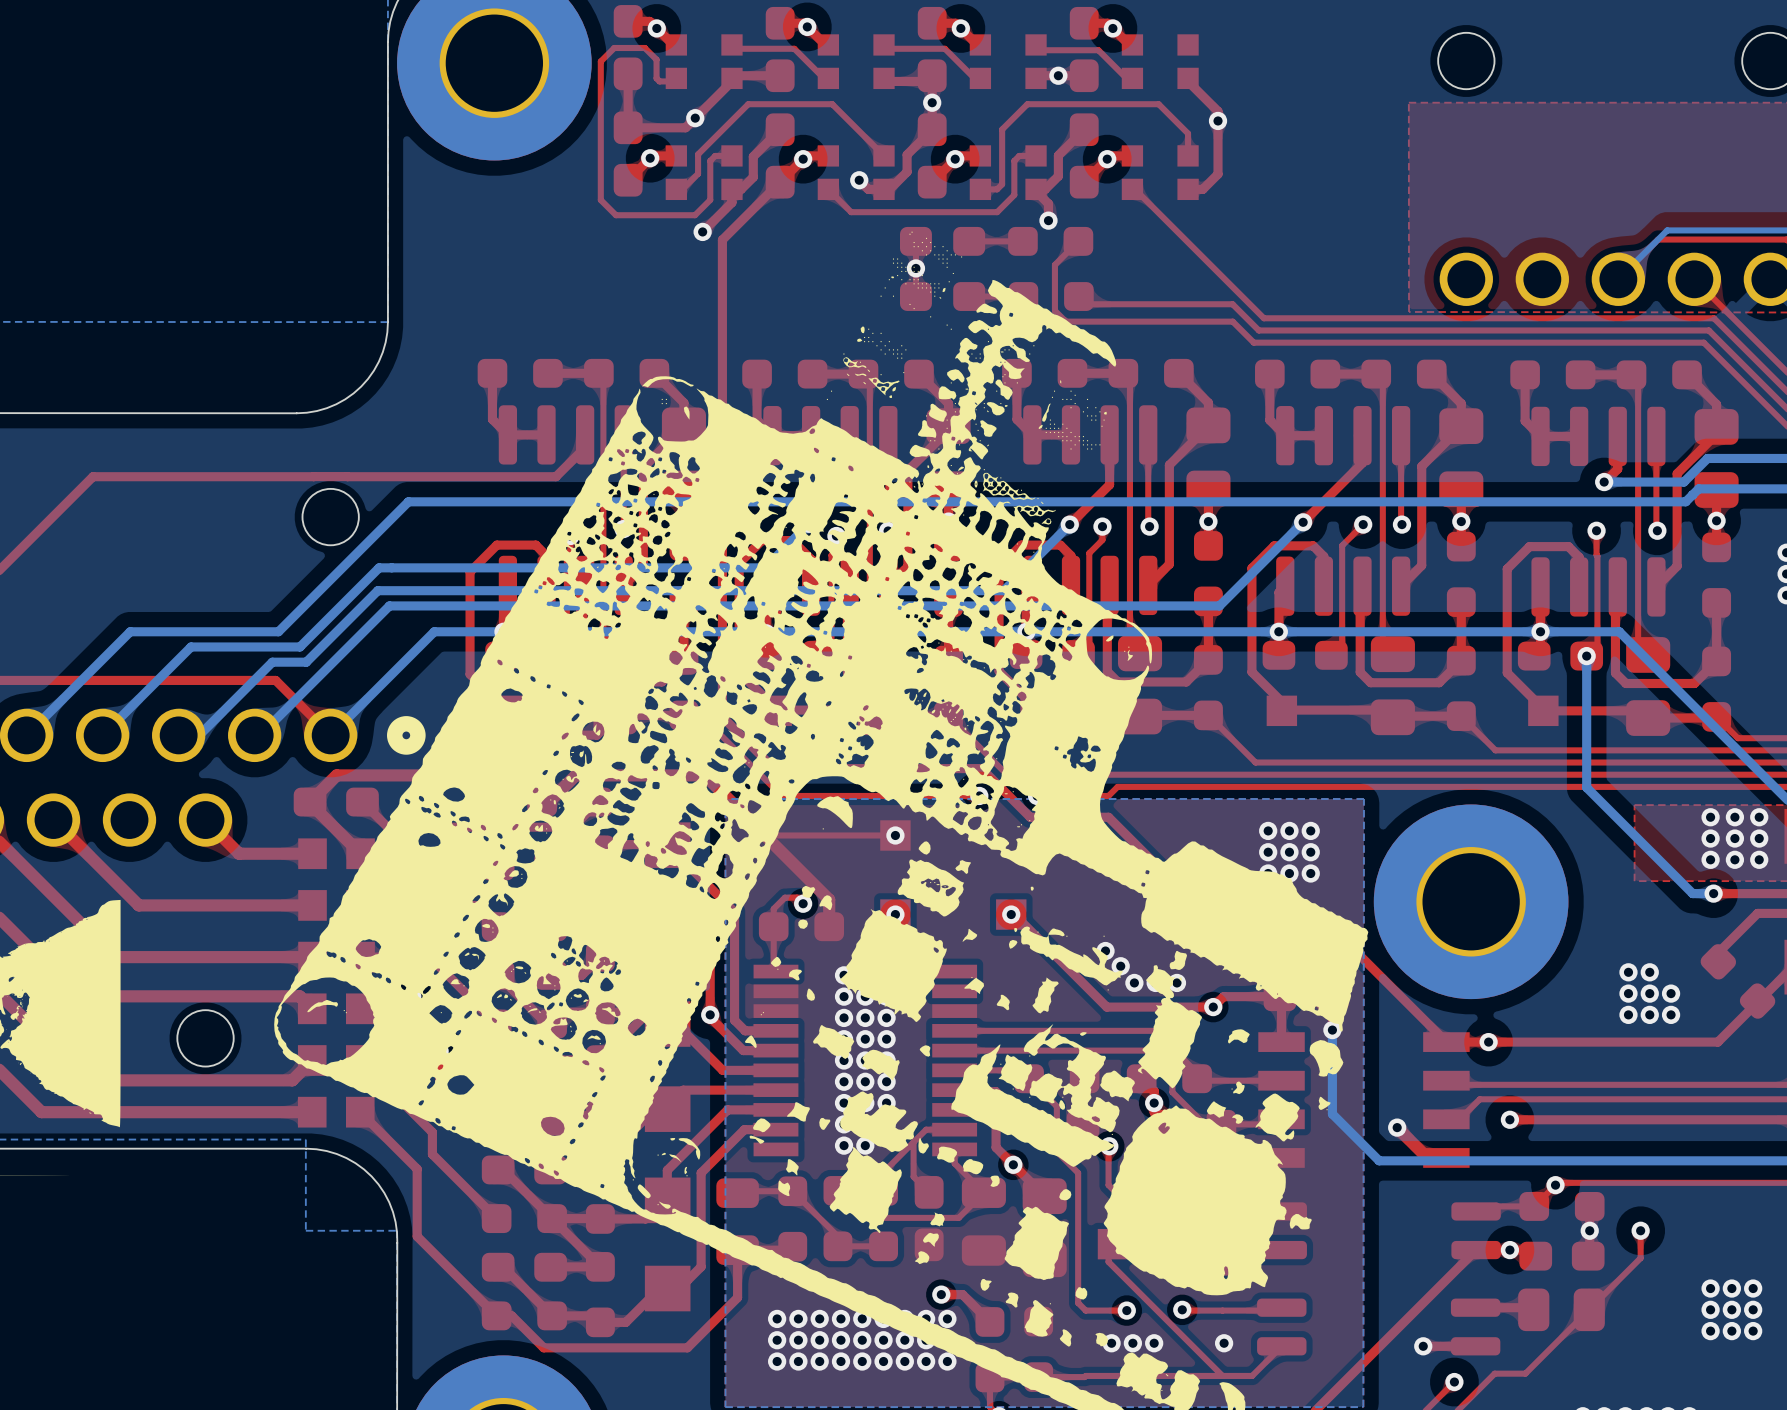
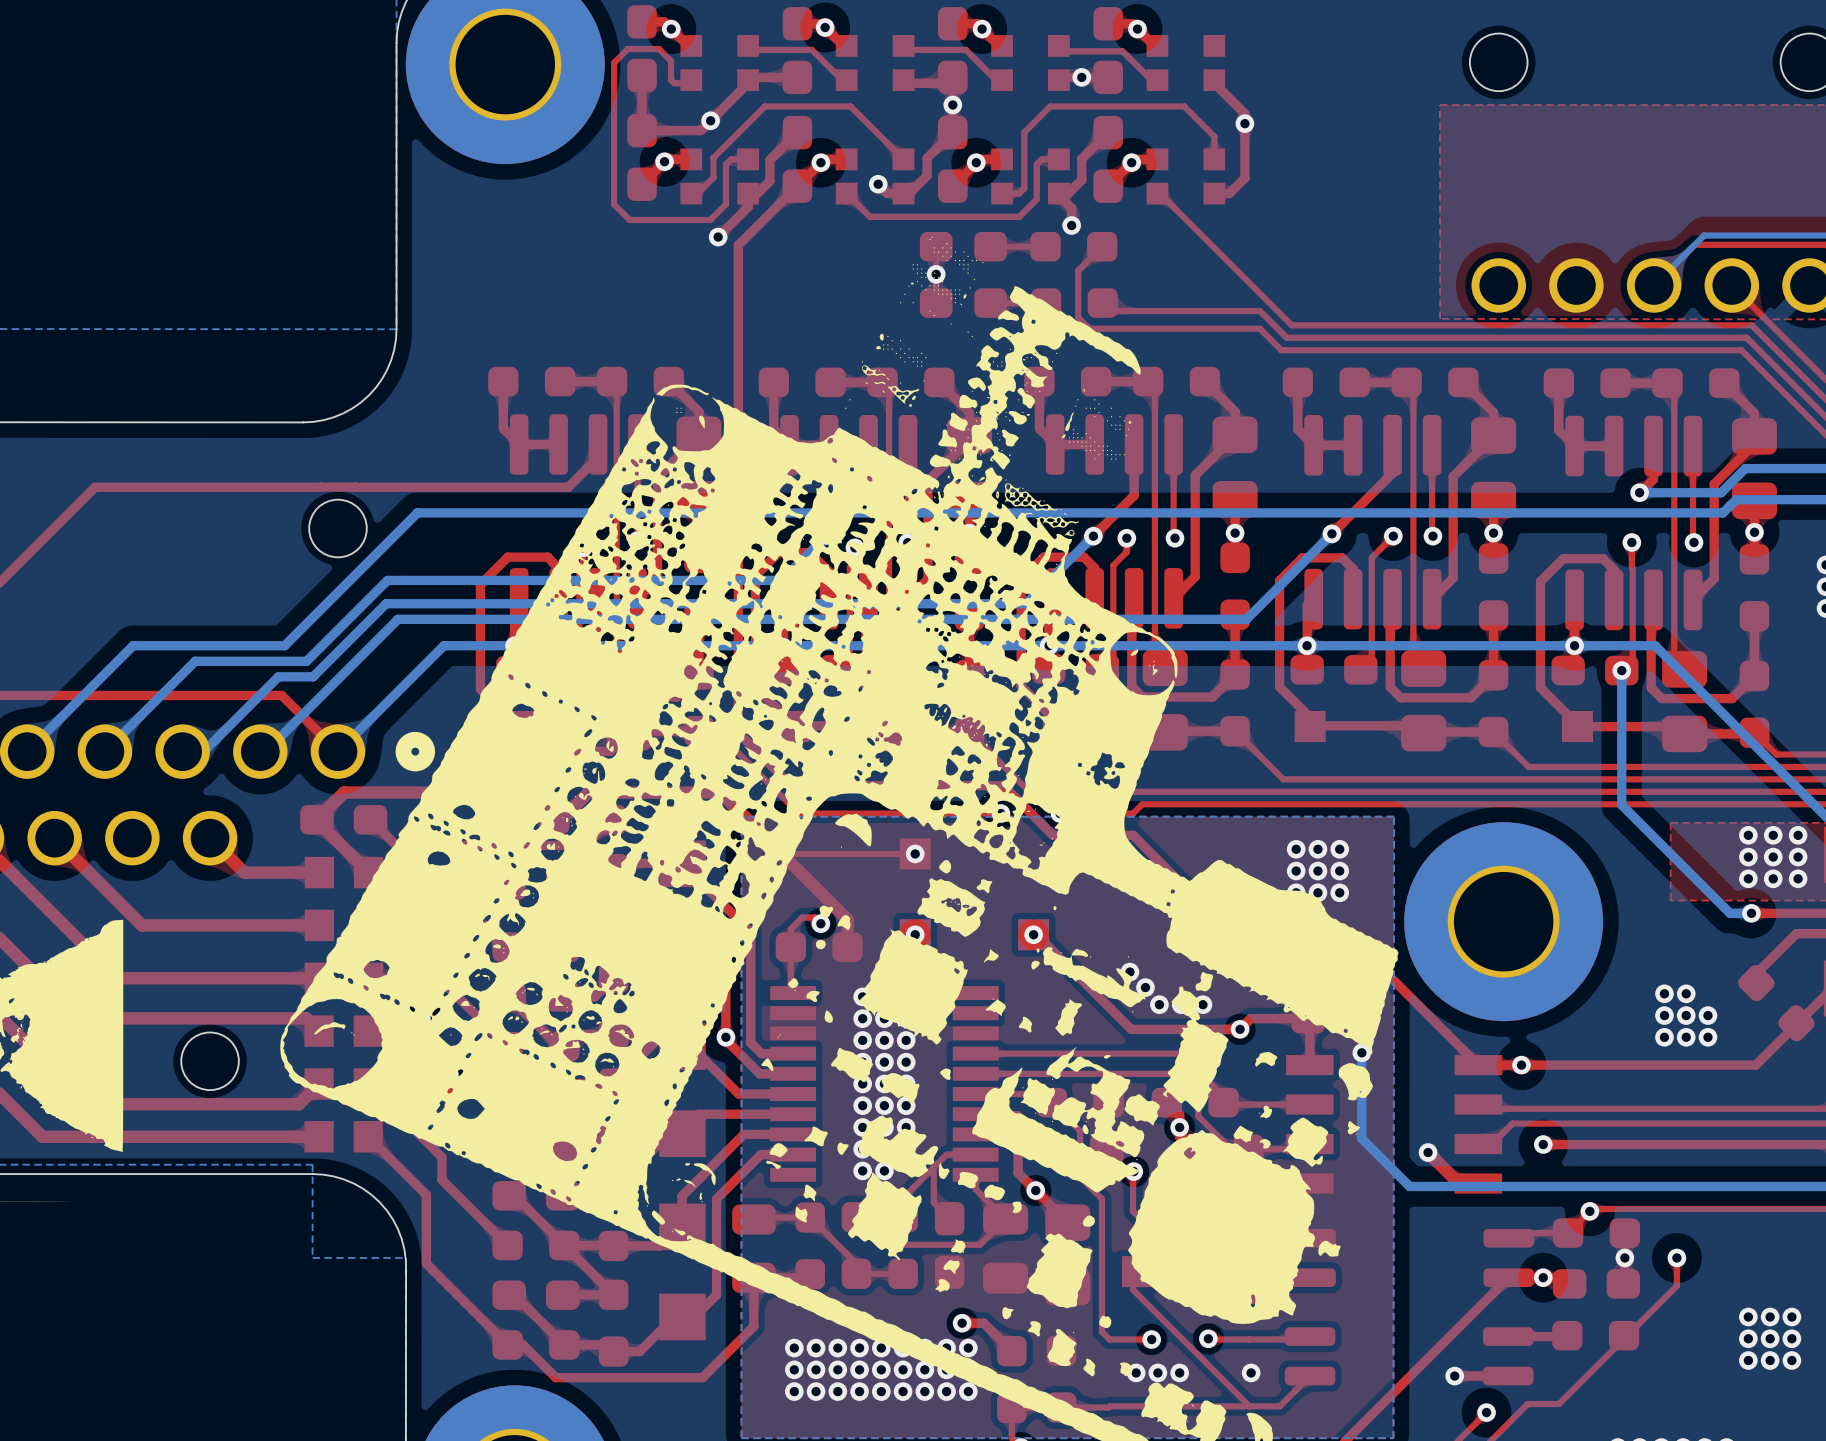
part footprint: [1518, 1288, 1605, 1332] -> [1552, 1320, 1640, 1351]

